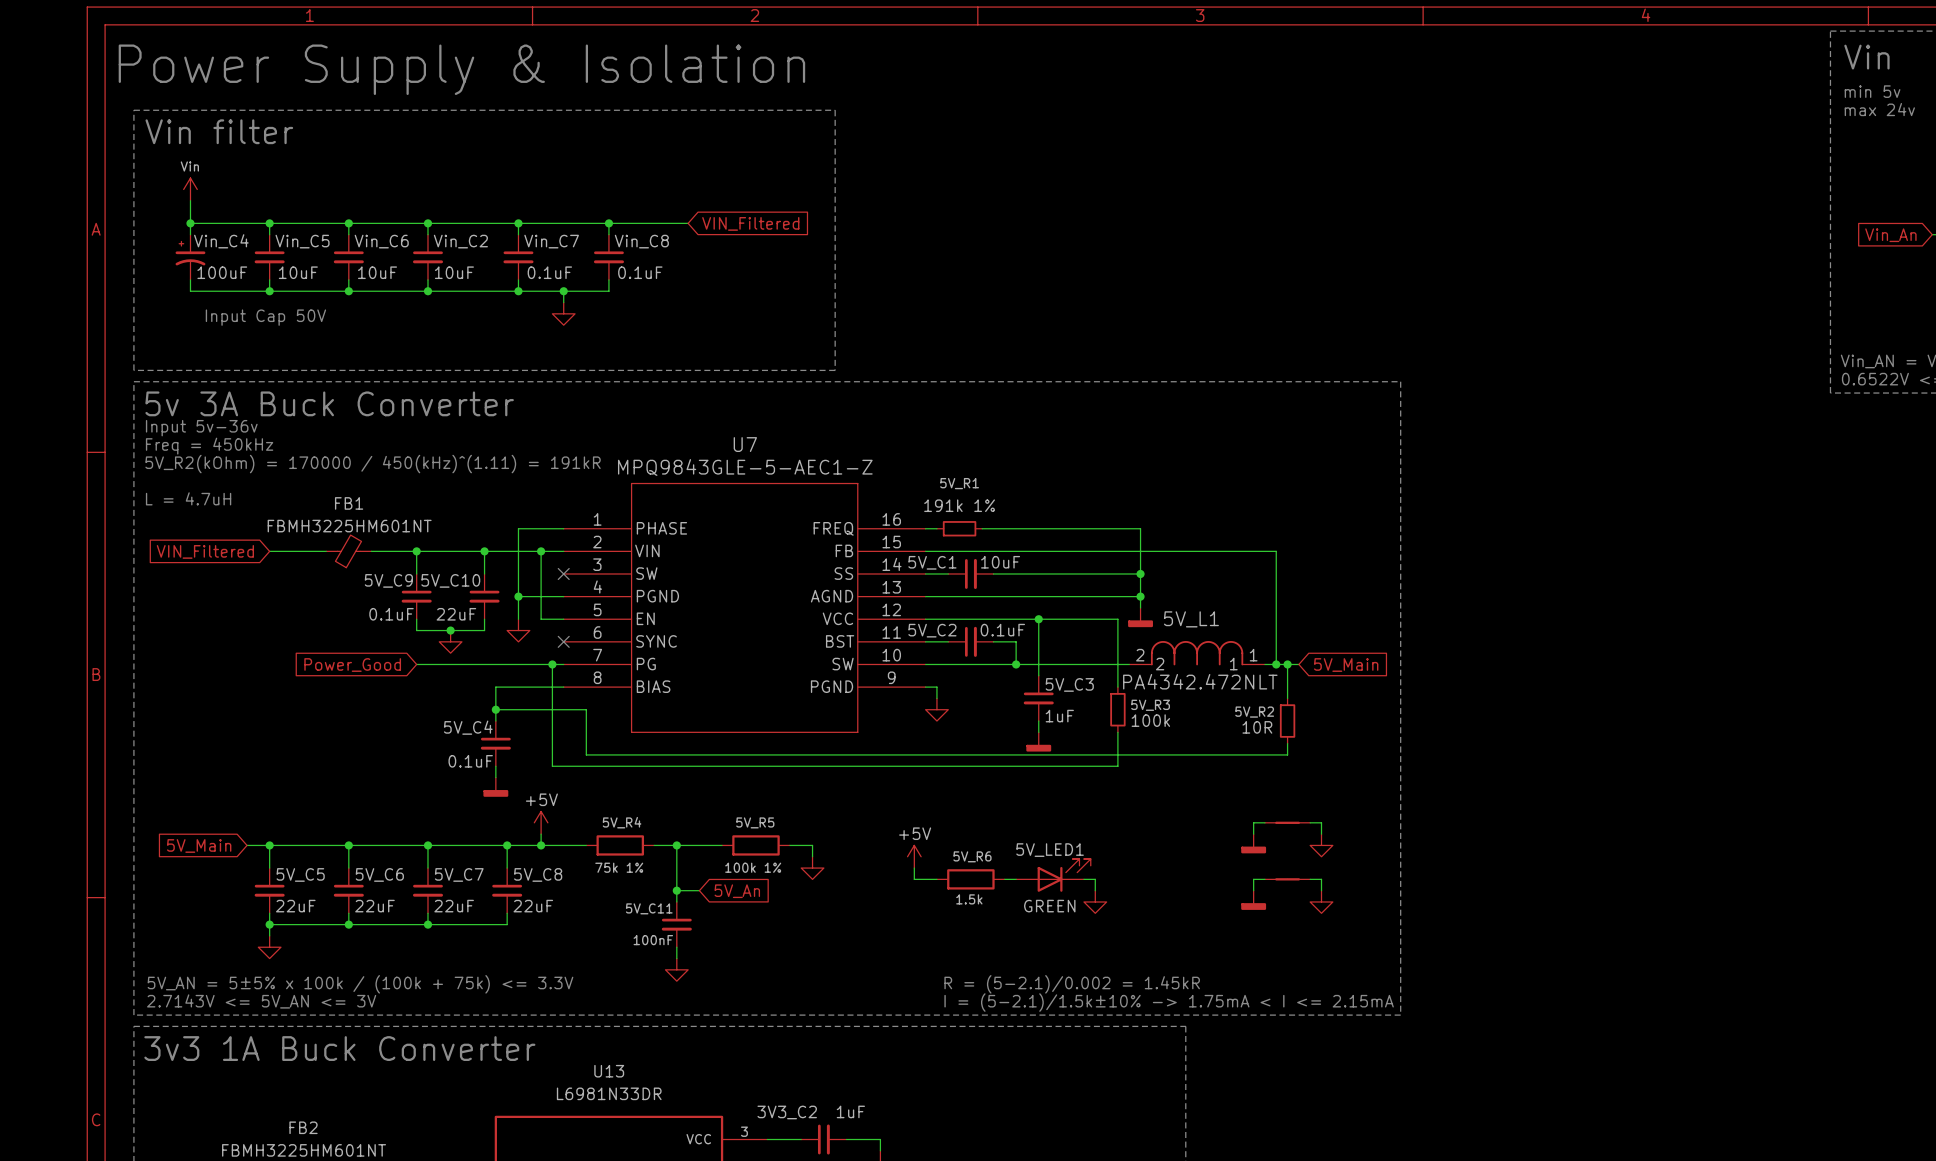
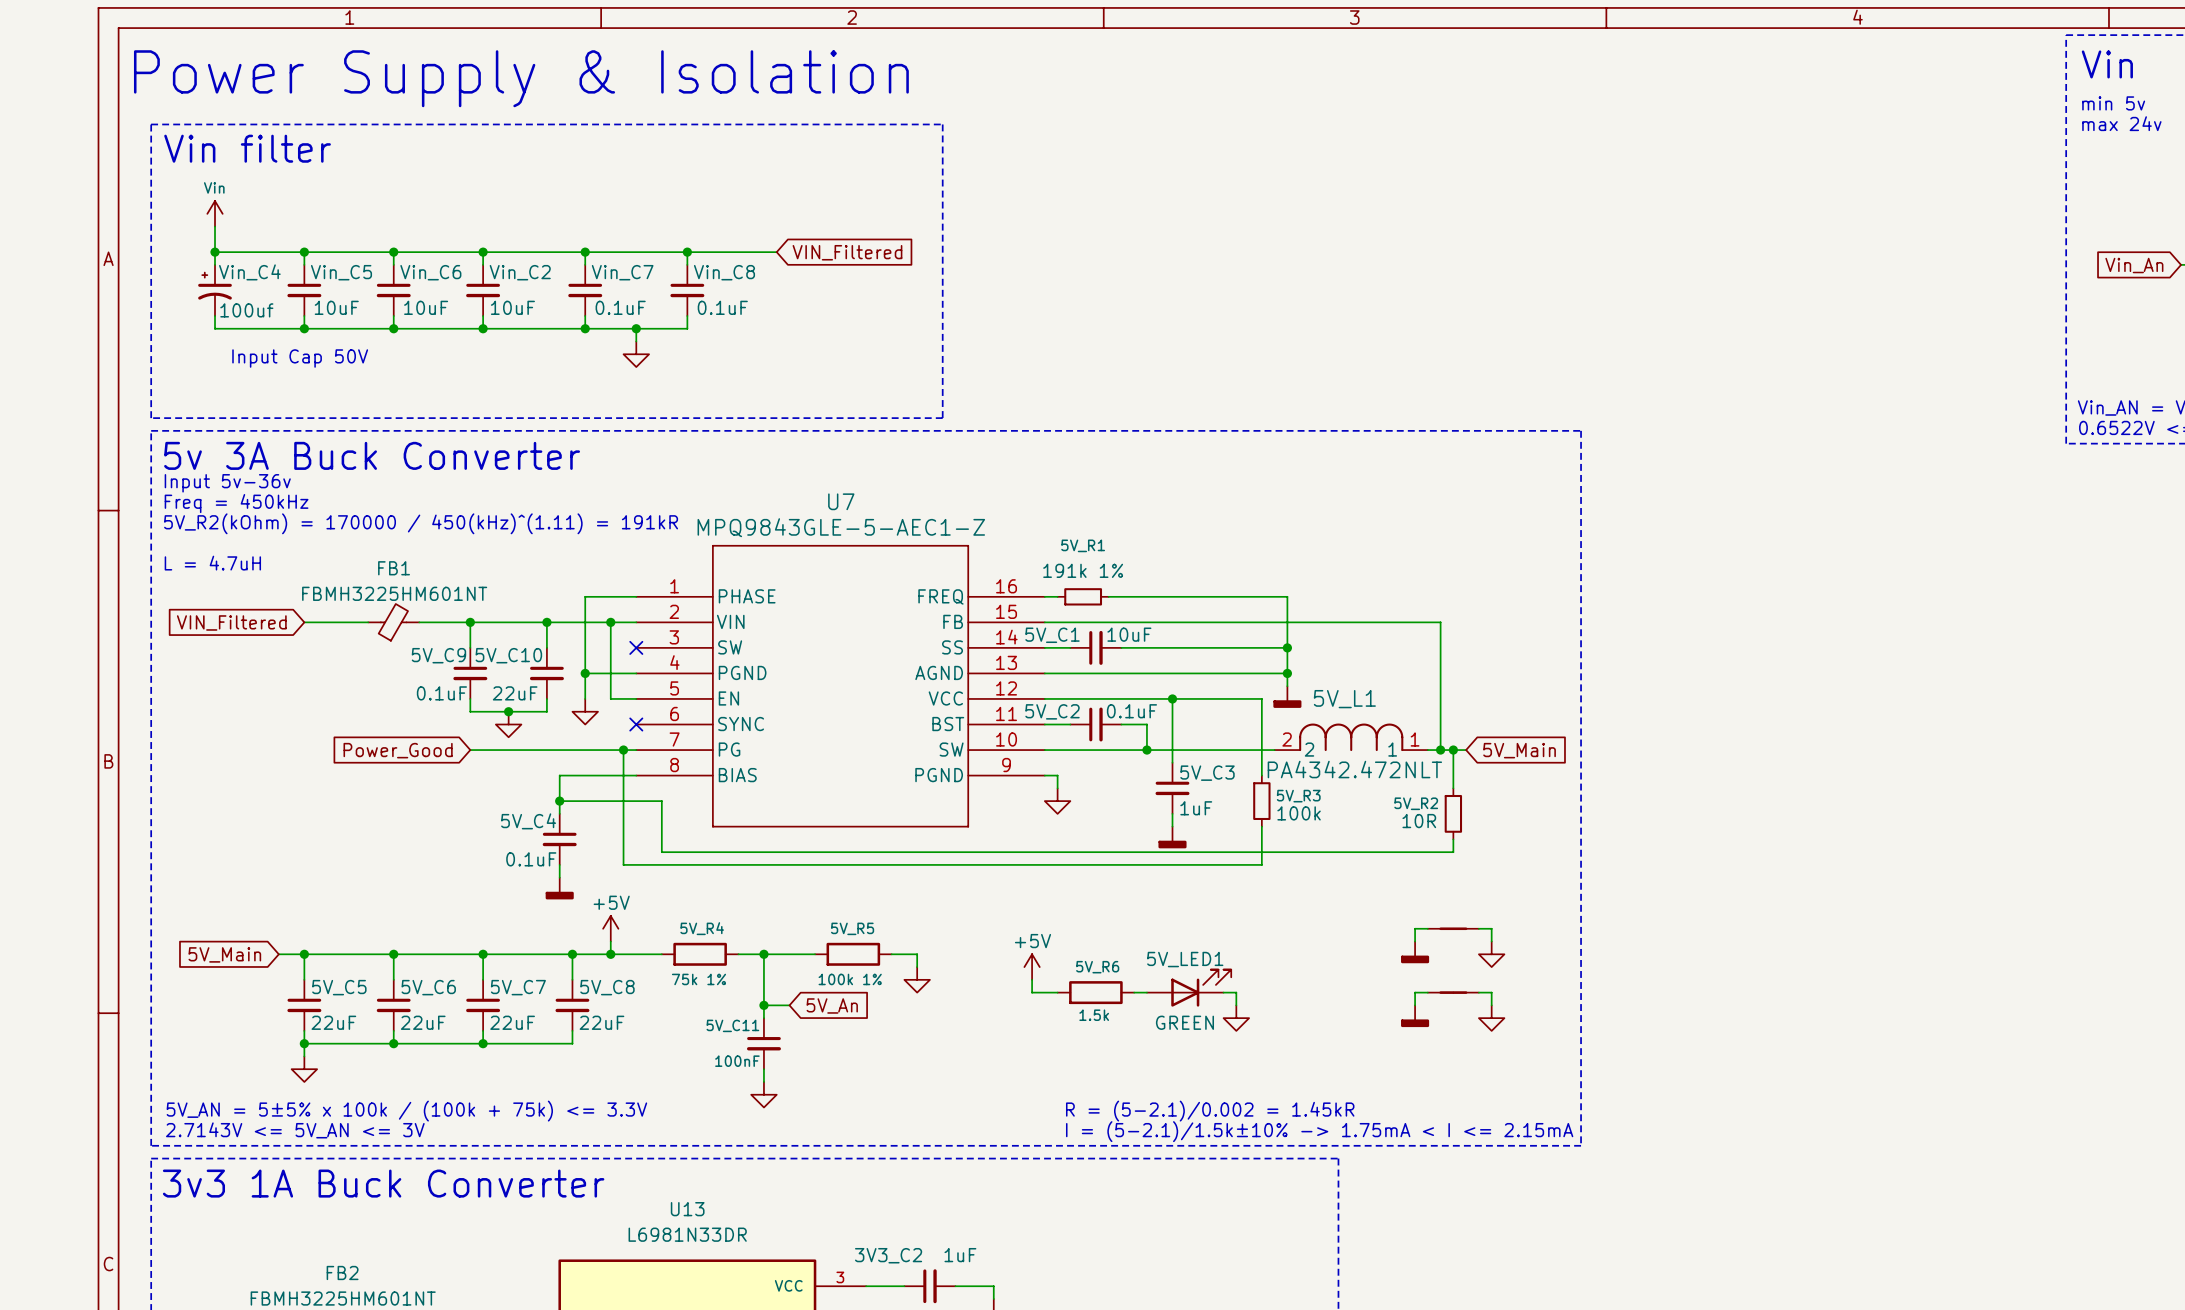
Vin_C4 value: 100uF (222, 272) -> 100uf (246, 310)

